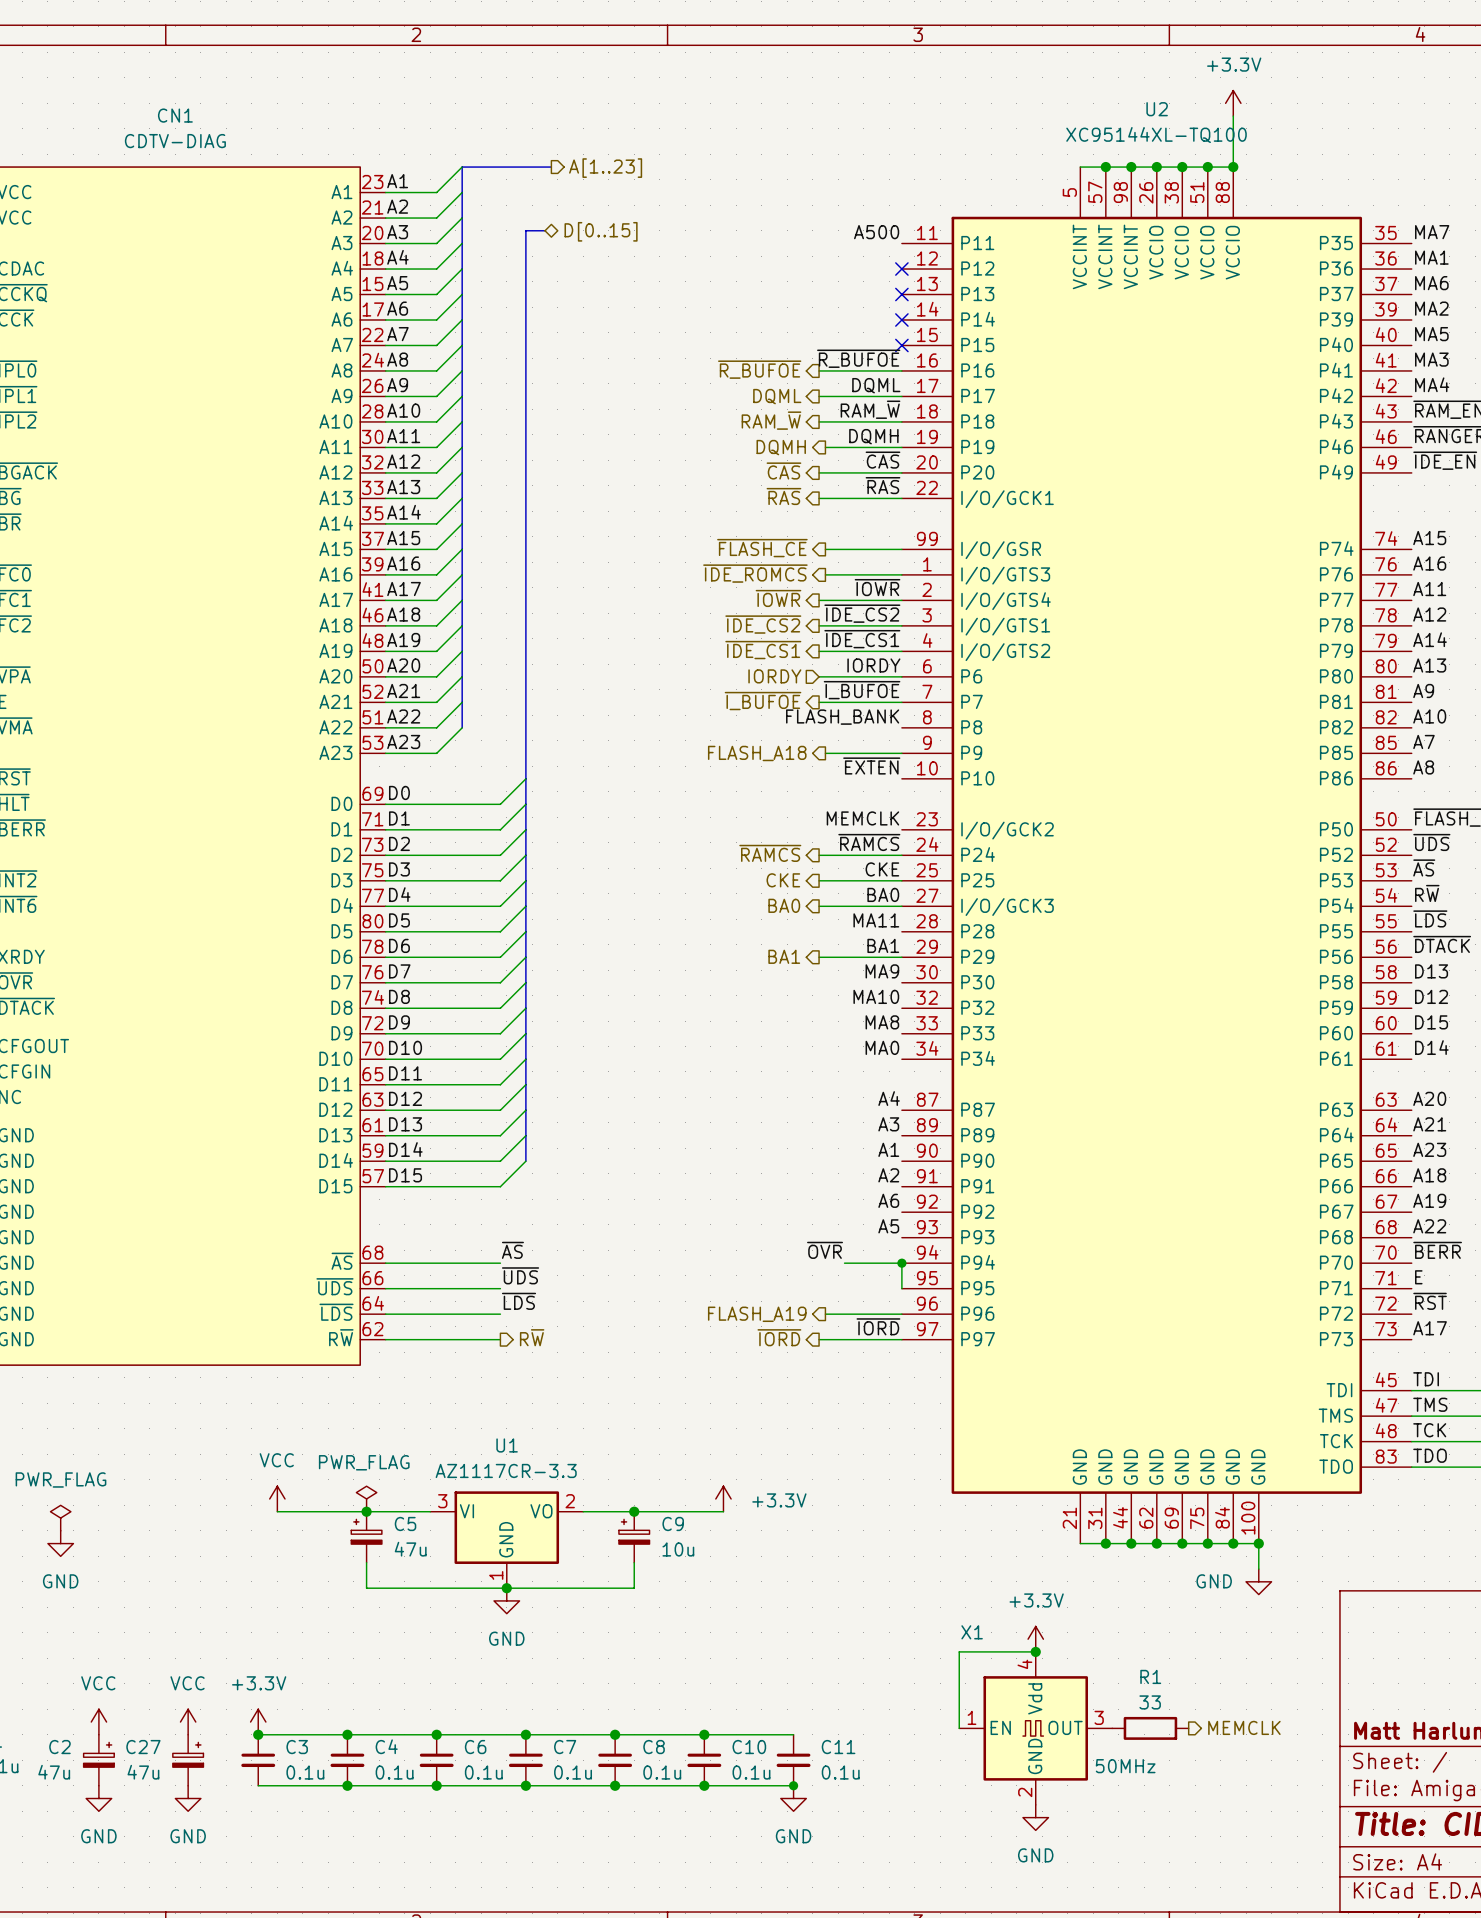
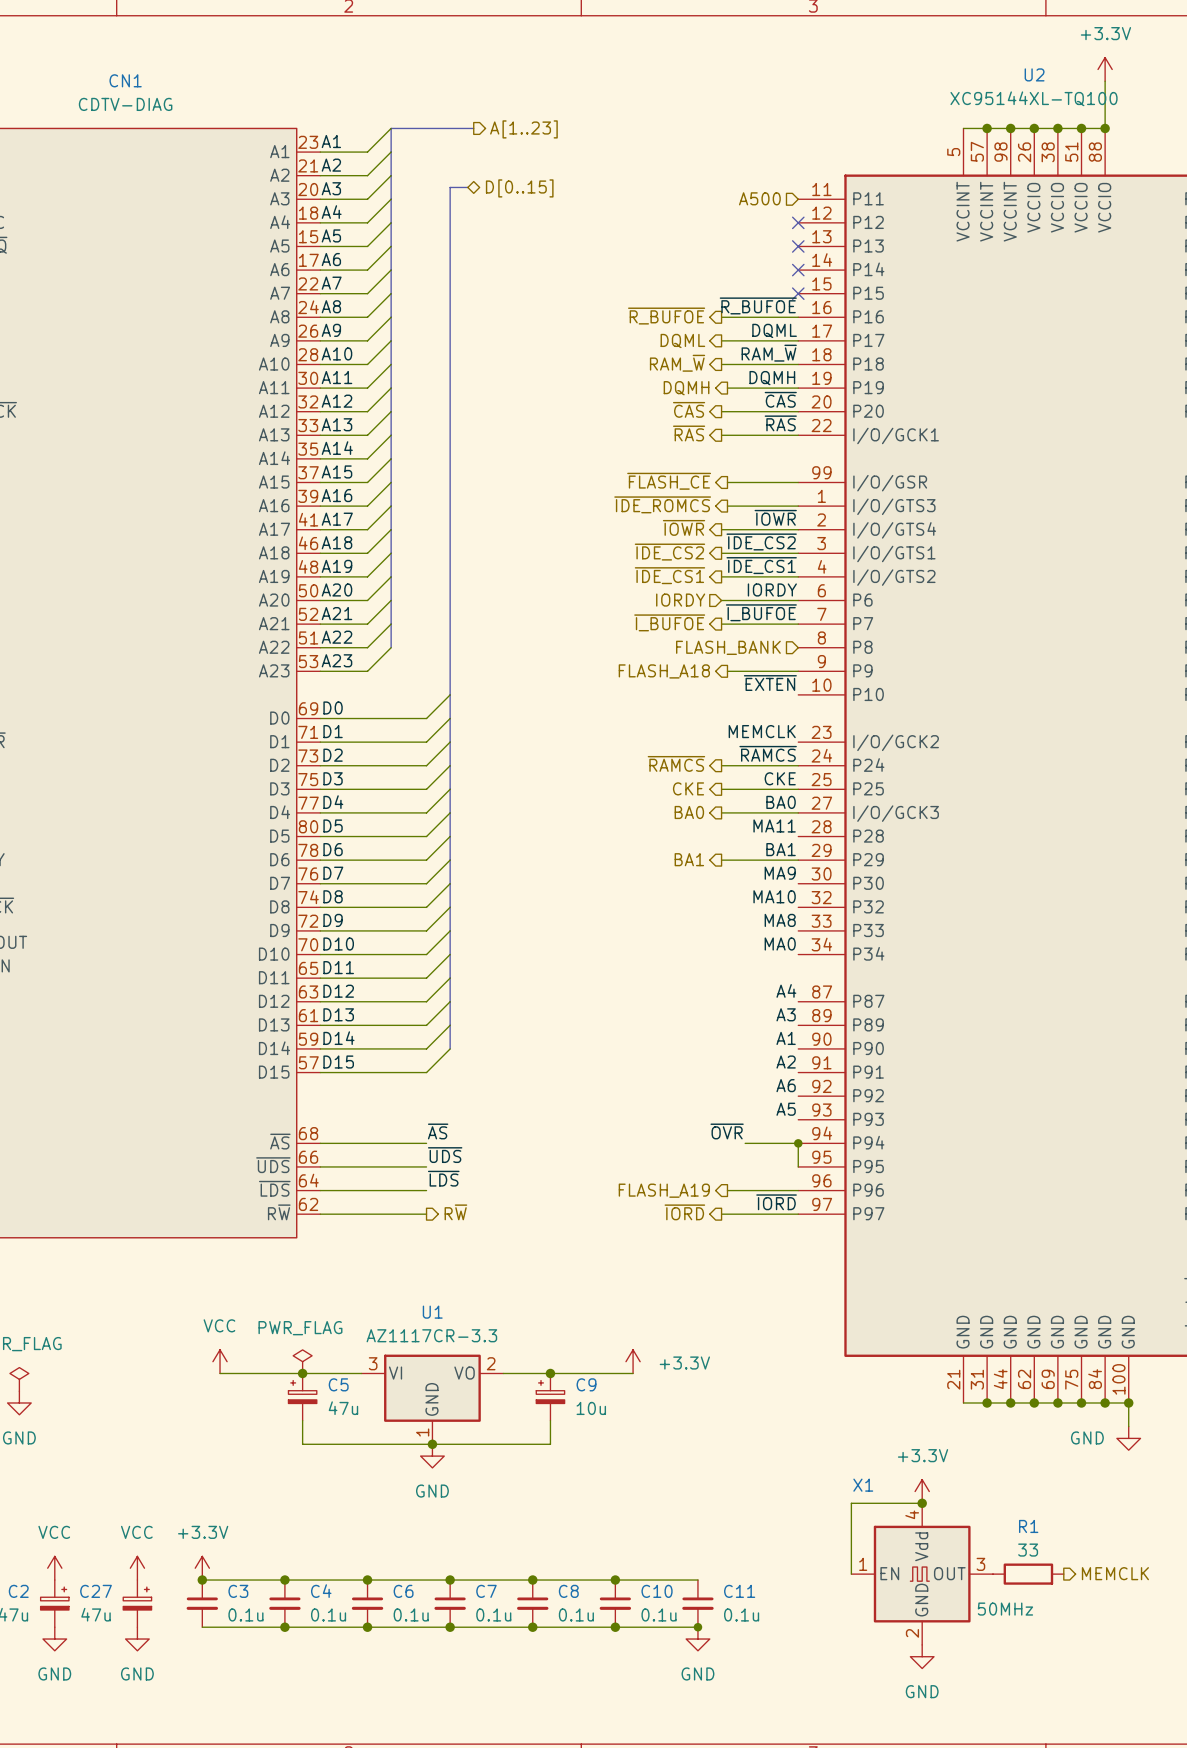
label: A500 (876, 232) -> none
hierarchical label: none -> A500 (759, 198)
label: FLASH_BANK (842, 717) -> none
hierarchical label: none -> FLASH_BANK (728, 647)

